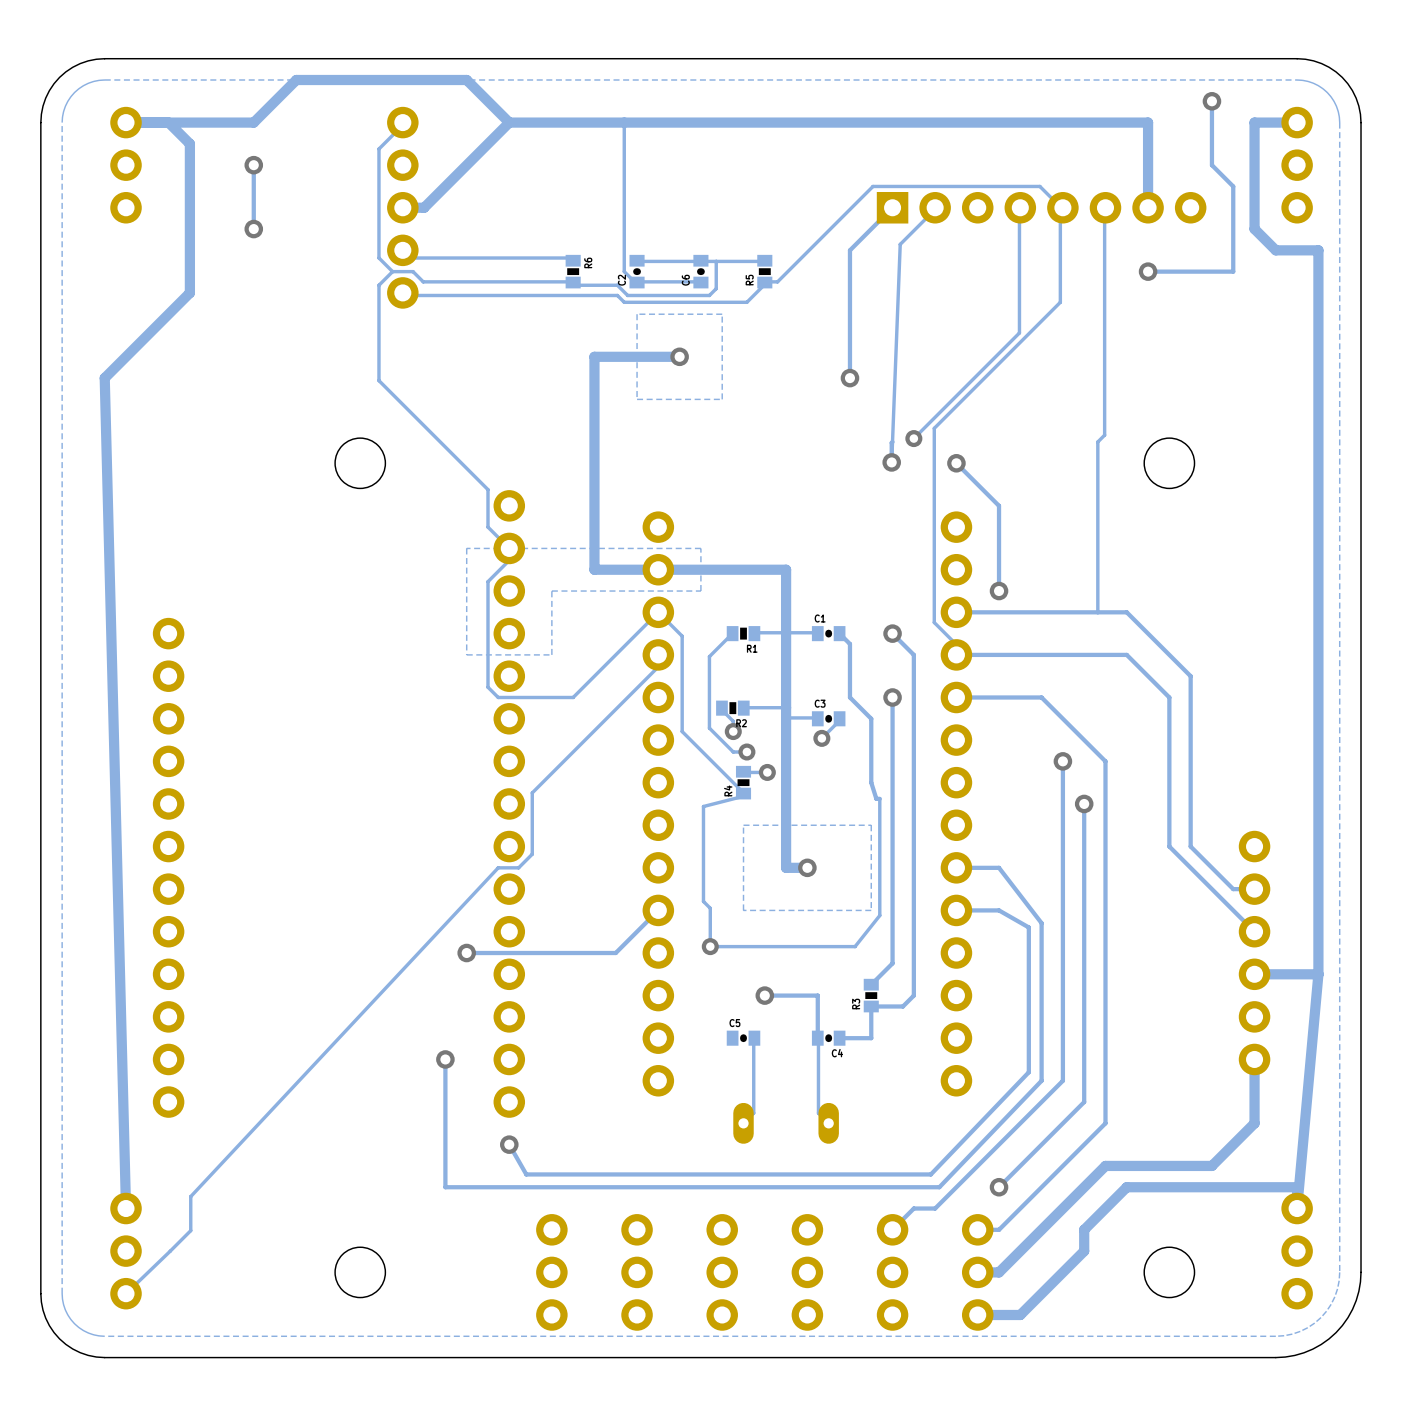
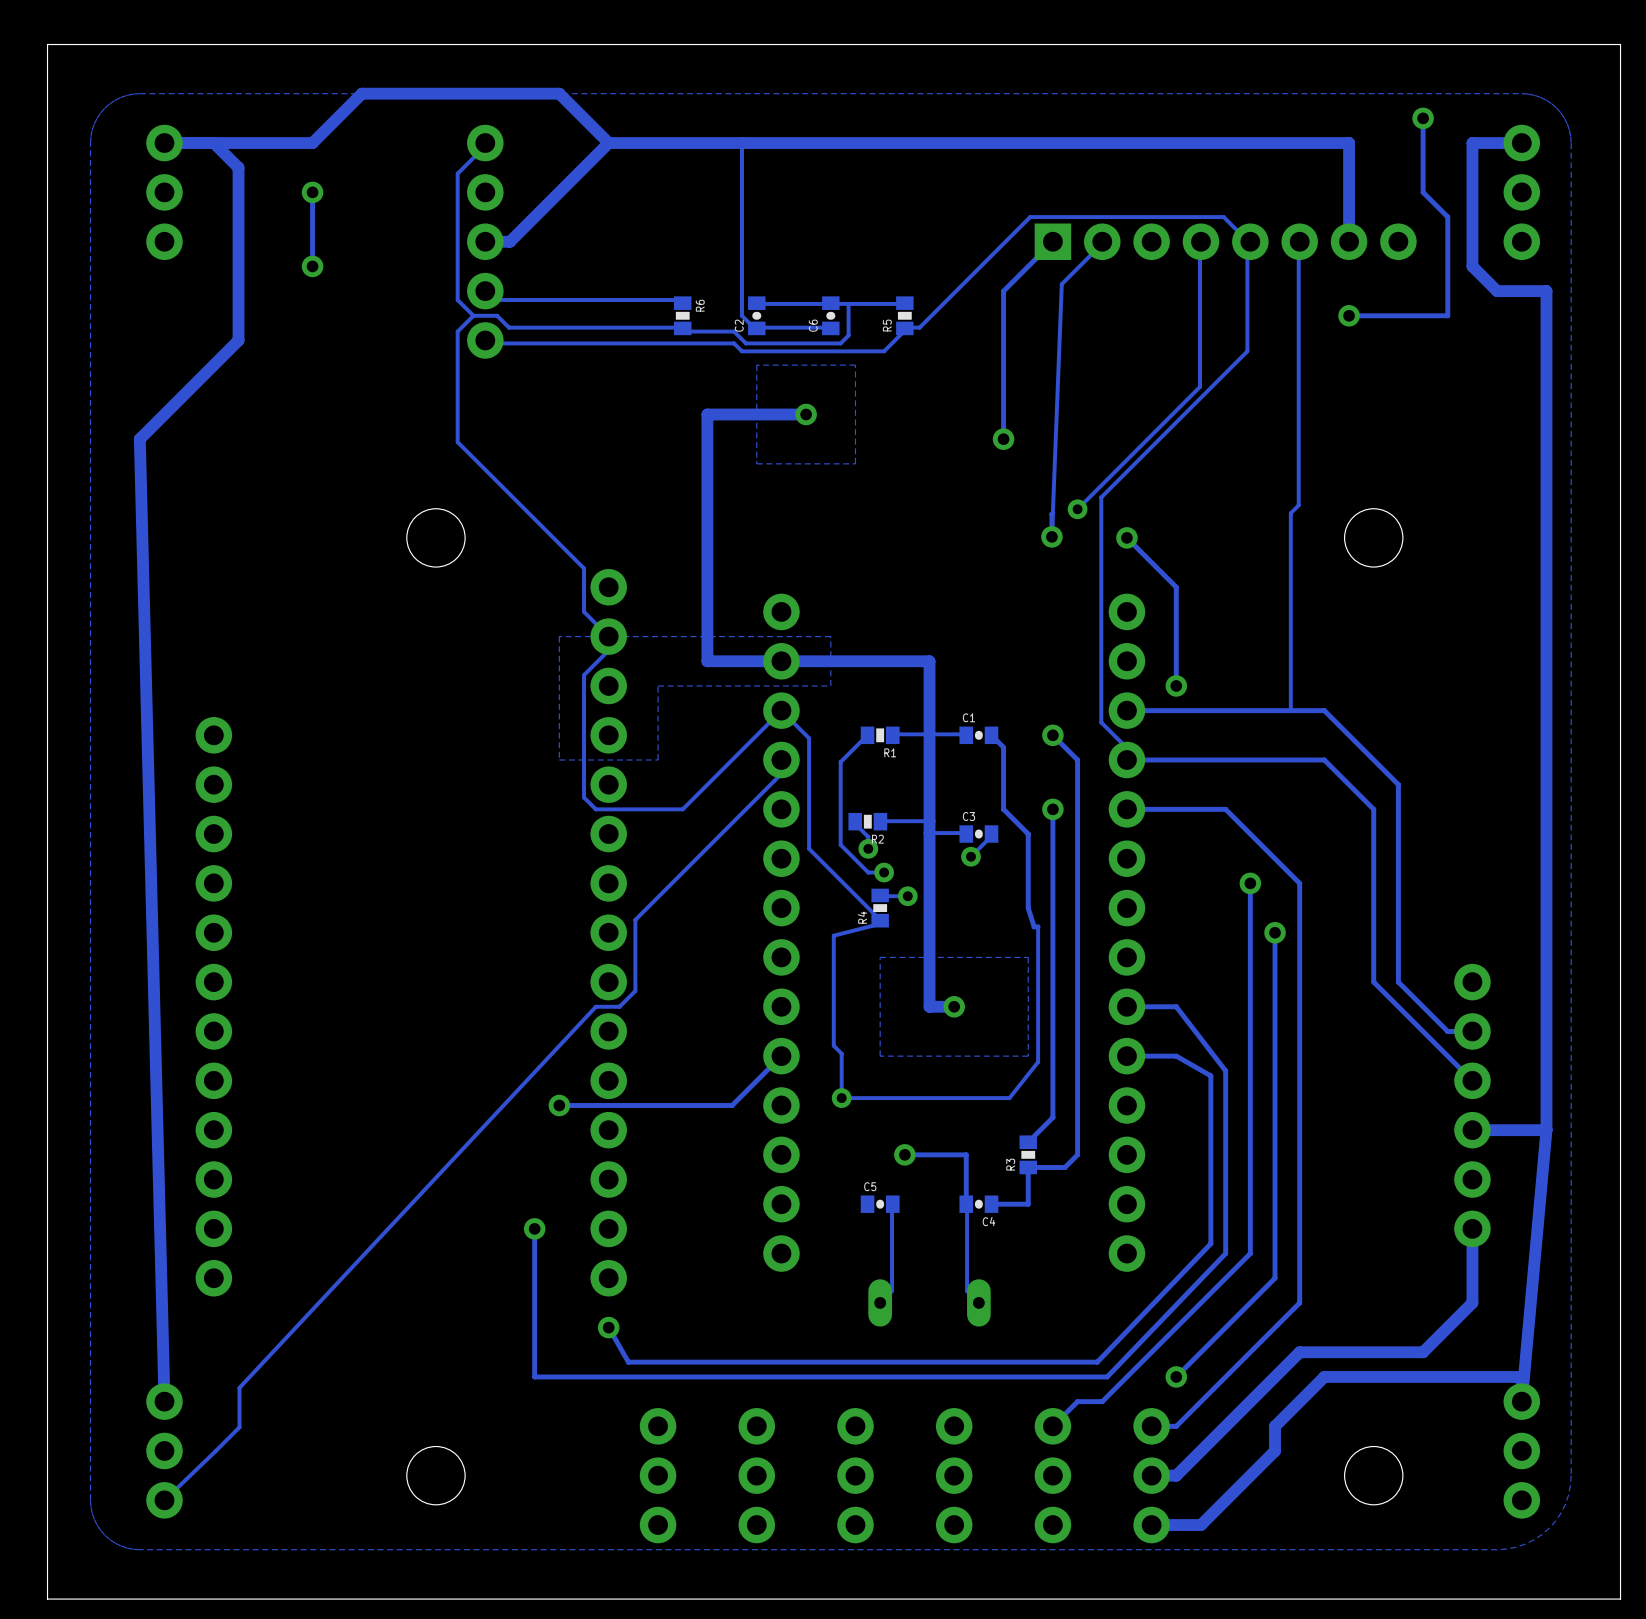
board edge: (1297, 58) (104, 58) (80, 63) (59, 77) (45, 98) (40, 122) (40, 1293) (45, 1318) (59, 1338) (80, 1352) (104, 1357) (1275, 1357) (1294, 1355) (1312, 1349) (1336, 1332) (1352, 1309) (1358, 1291) (1361, 1272) (1361, 122) (1356, 98) (1342, 77) (1321, 63) (1297, 58) -> (1620, 44) (1620, 1599) (47, 1599) (47, 44) (1620, 44)

